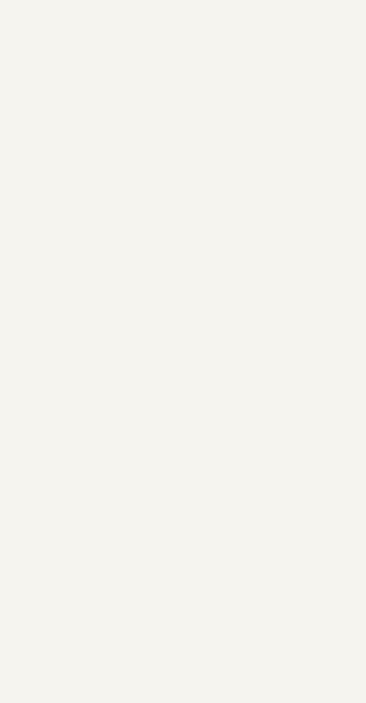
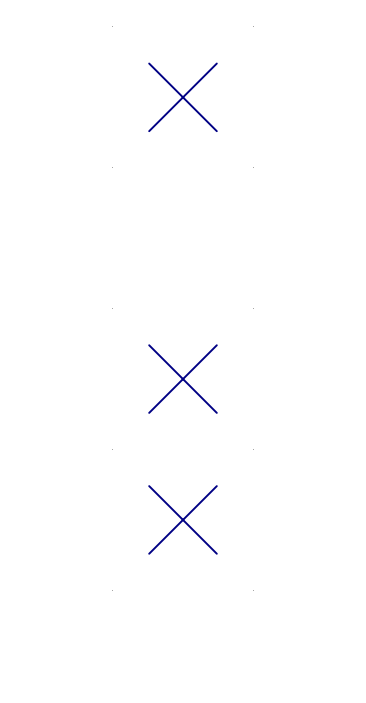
no-connect mark: none -> (182, 97)
no-connect mark: none -> (182, 379)
no-connect mark: none -> (182, 519)

